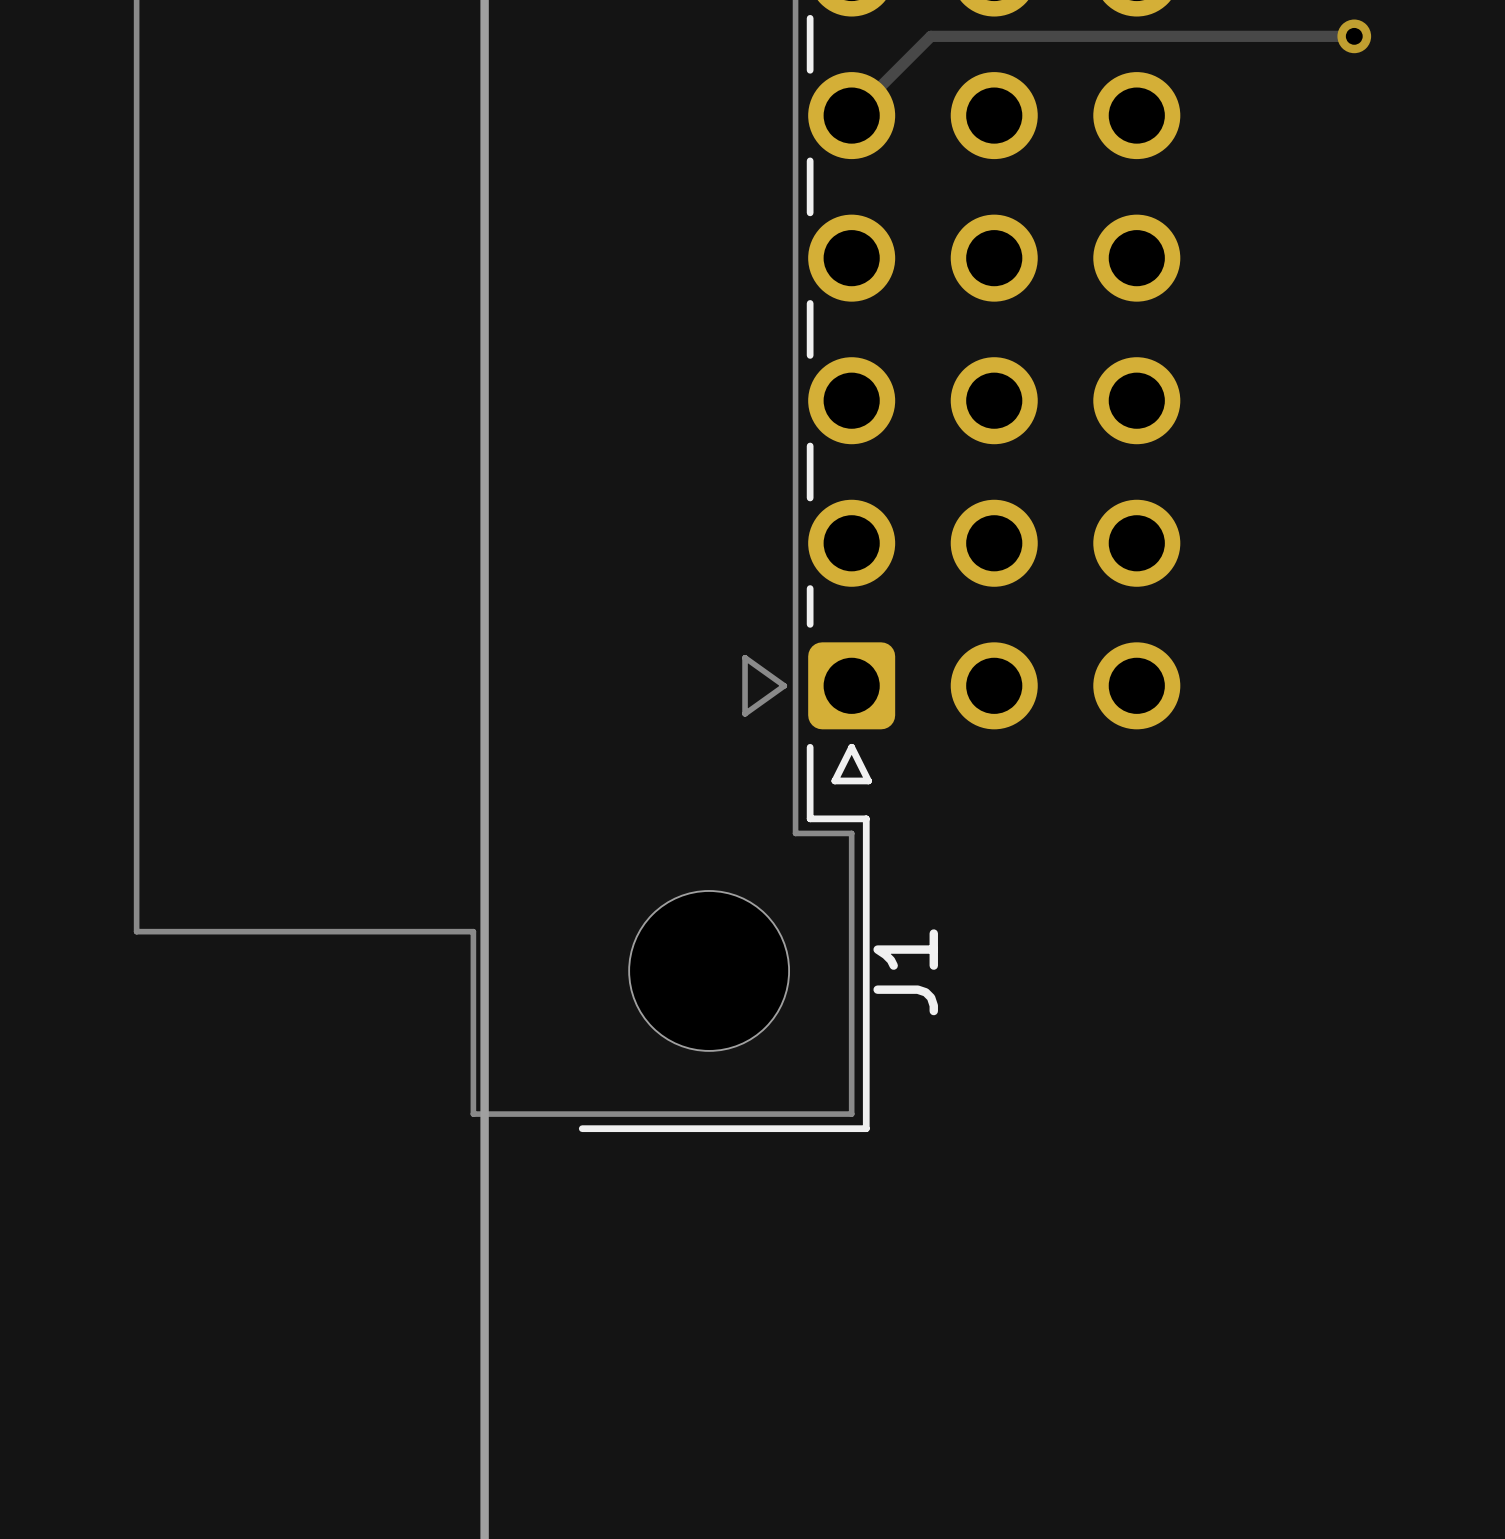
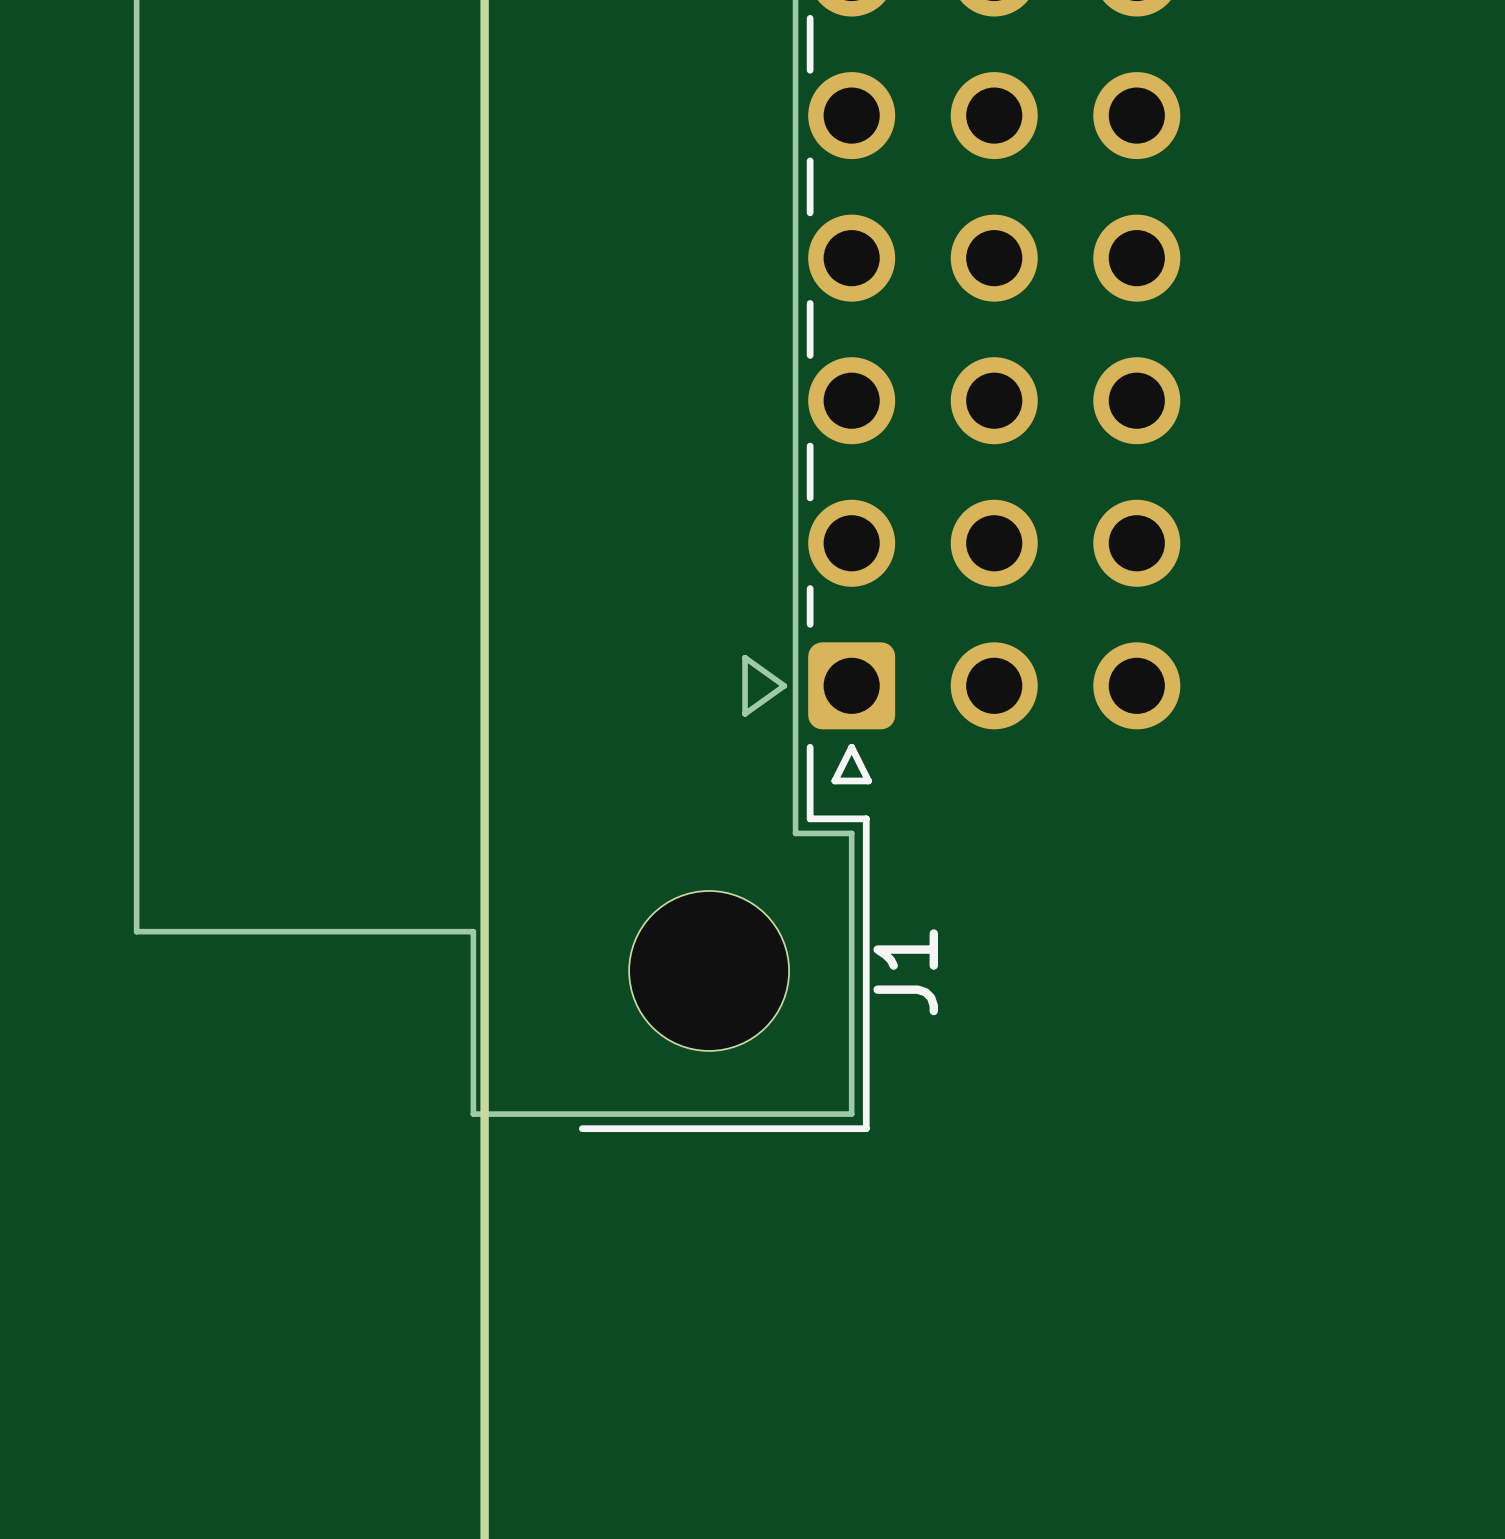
track: (1354, 36) (930, 36) (851, 115) -> none
via: (1354, 36) -> none

